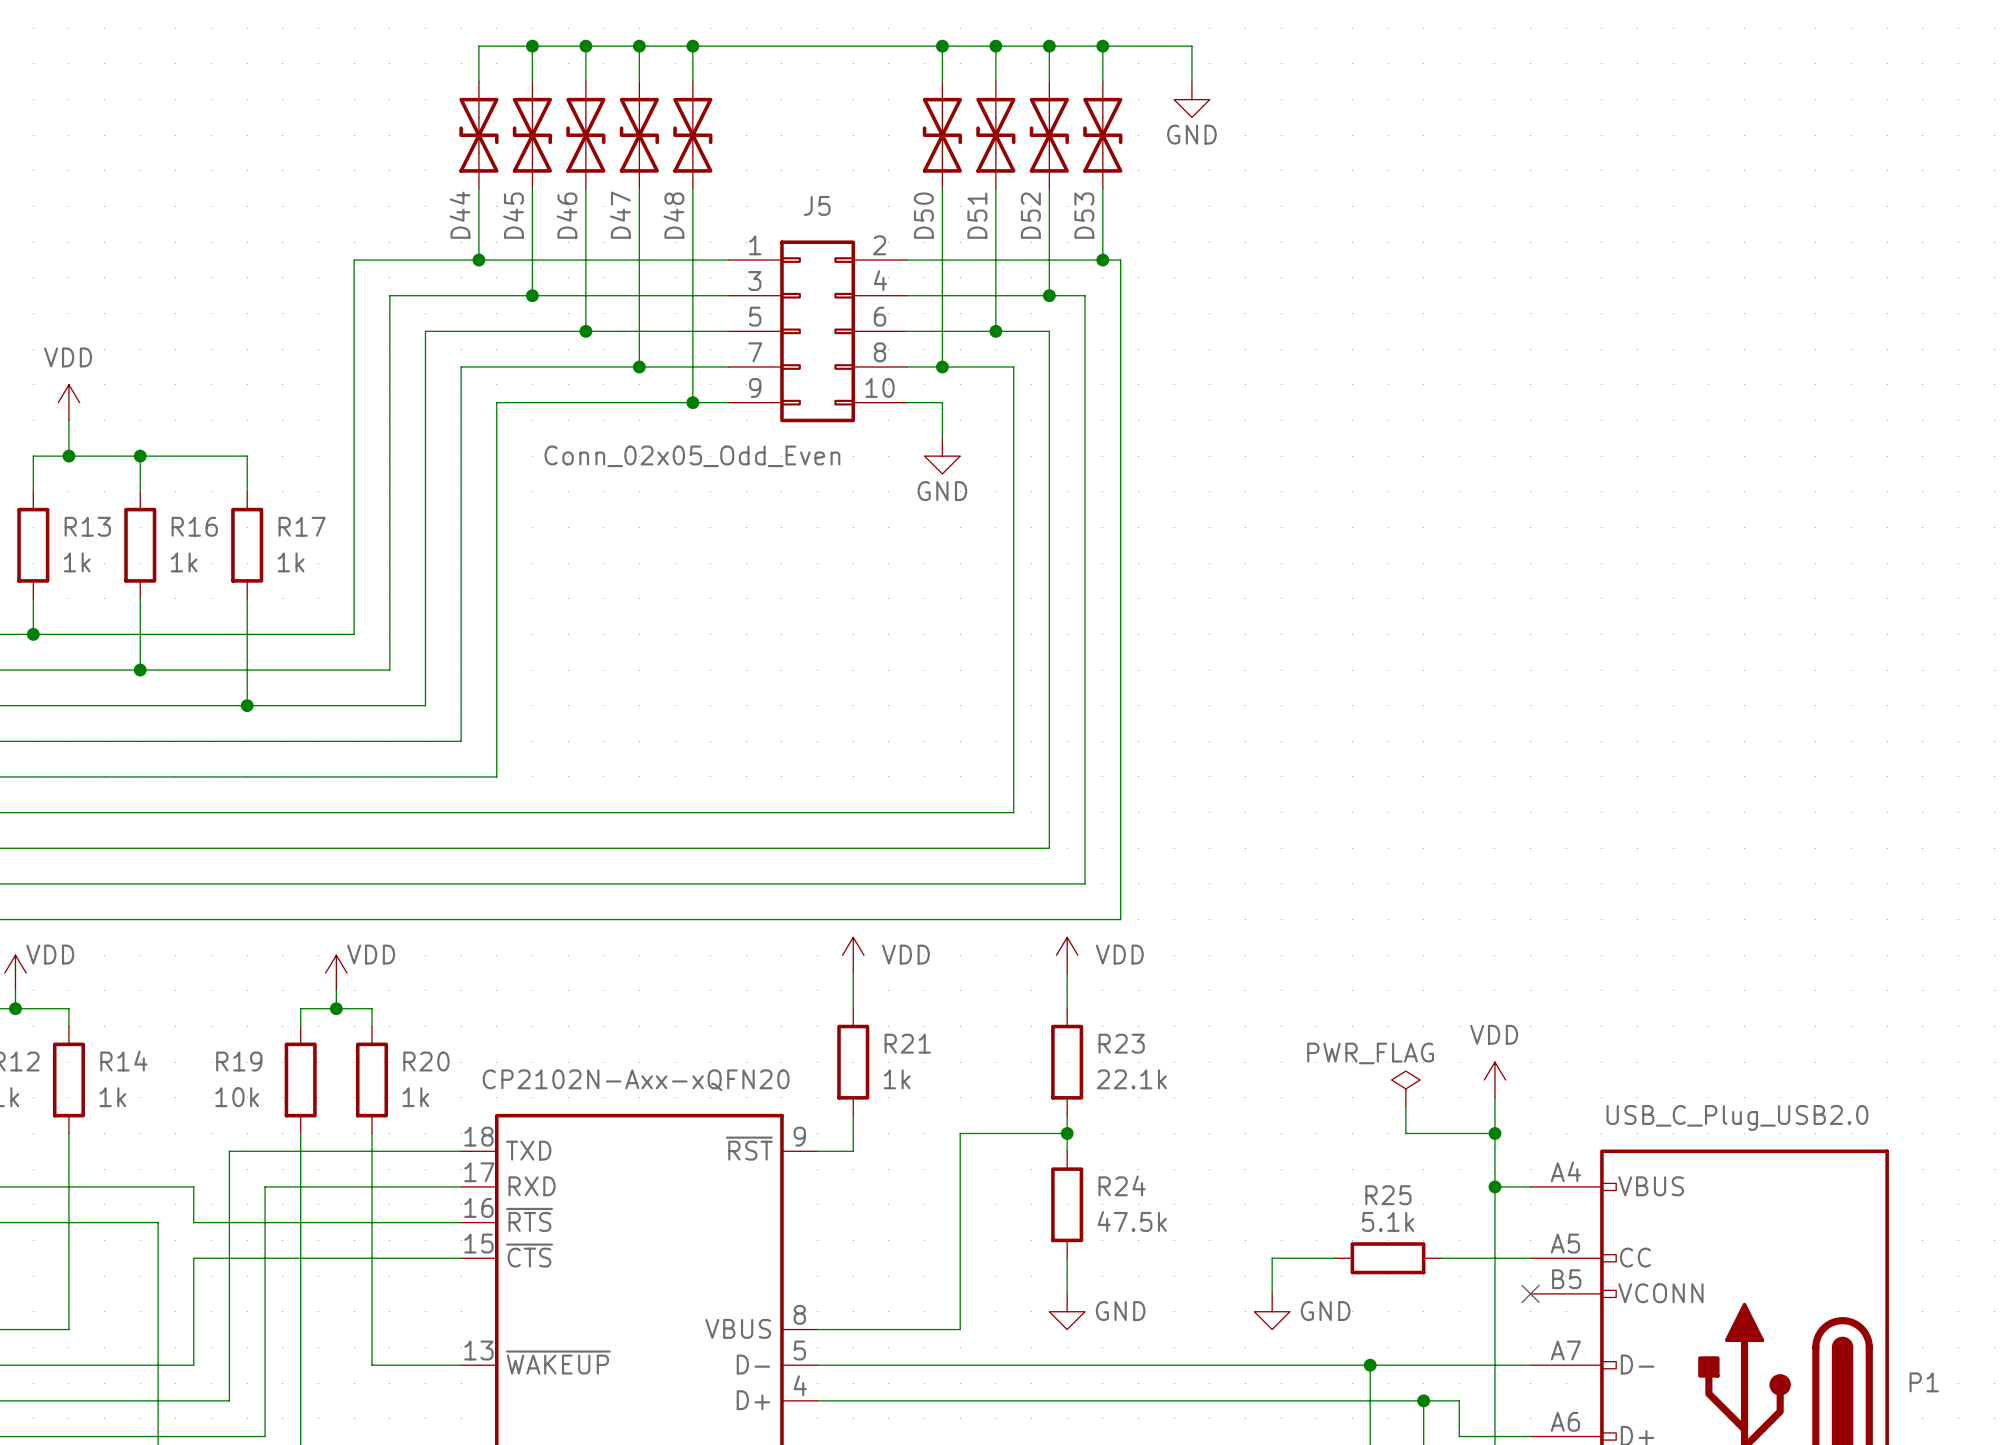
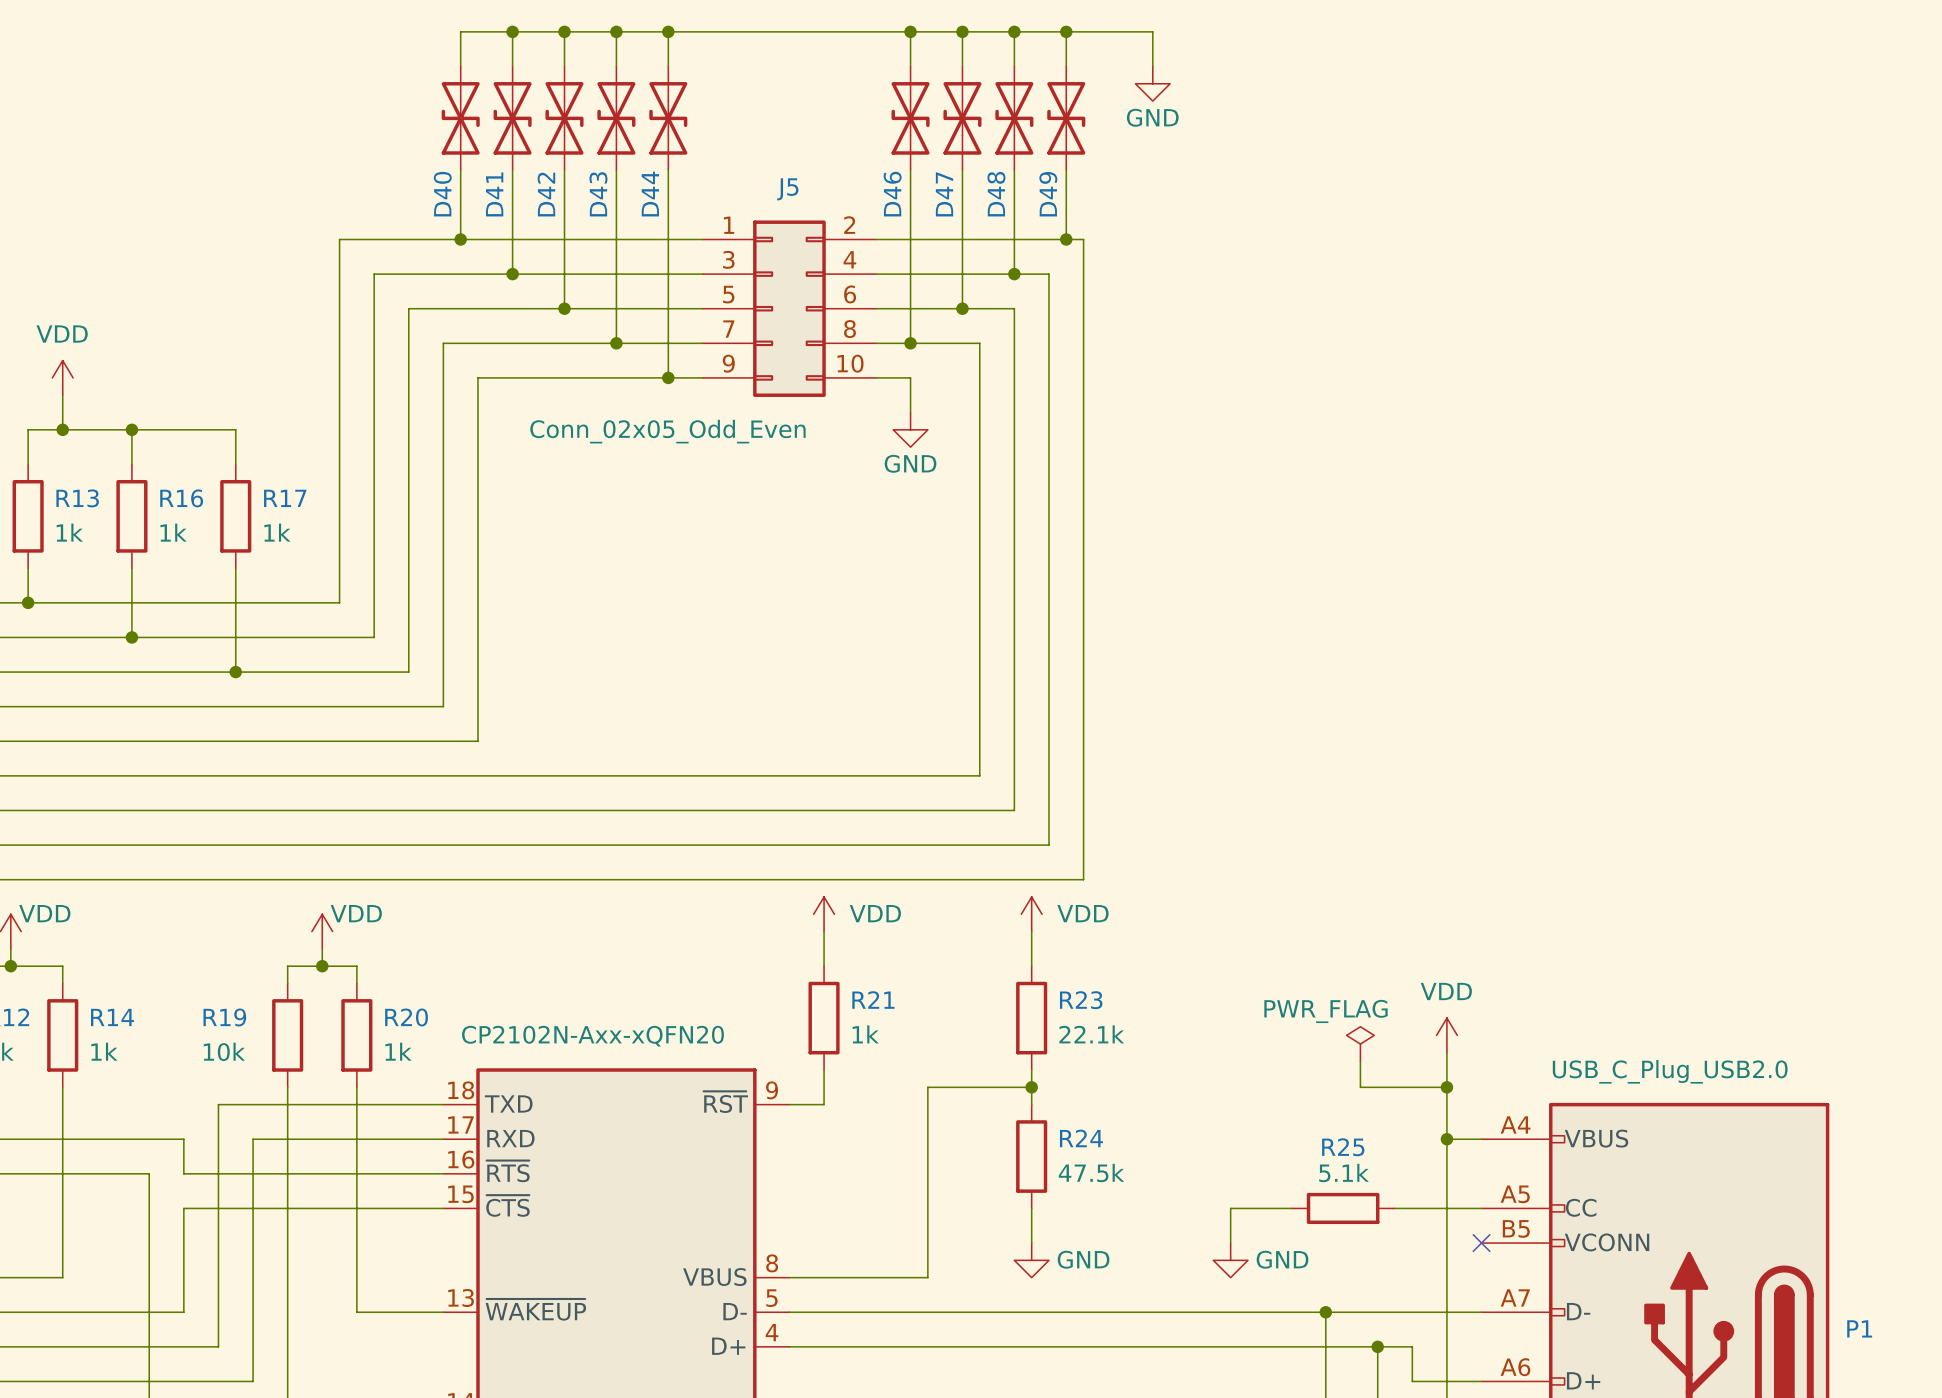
D44 name: D44 (460, 215) -> D40 (442, 194)
D45 name: D45 (513, 215) -> D41 (494, 194)
D46 name: D46 (566, 215) -> D42 (546, 194)
D47 name: D47 (620, 215) -> D43 (598, 194)
D48 name: D48 (673, 215) -> D44 (650, 194)
D50 name: D50 (923, 215) -> D46 (892, 194)
D51 name: D51 (977, 215) -> D47 (944, 194)
D52 name: D52 (1030, 215) -> D48 (996, 194)
D53 name: D53 (1084, 215) -> D49 (1048, 194)

